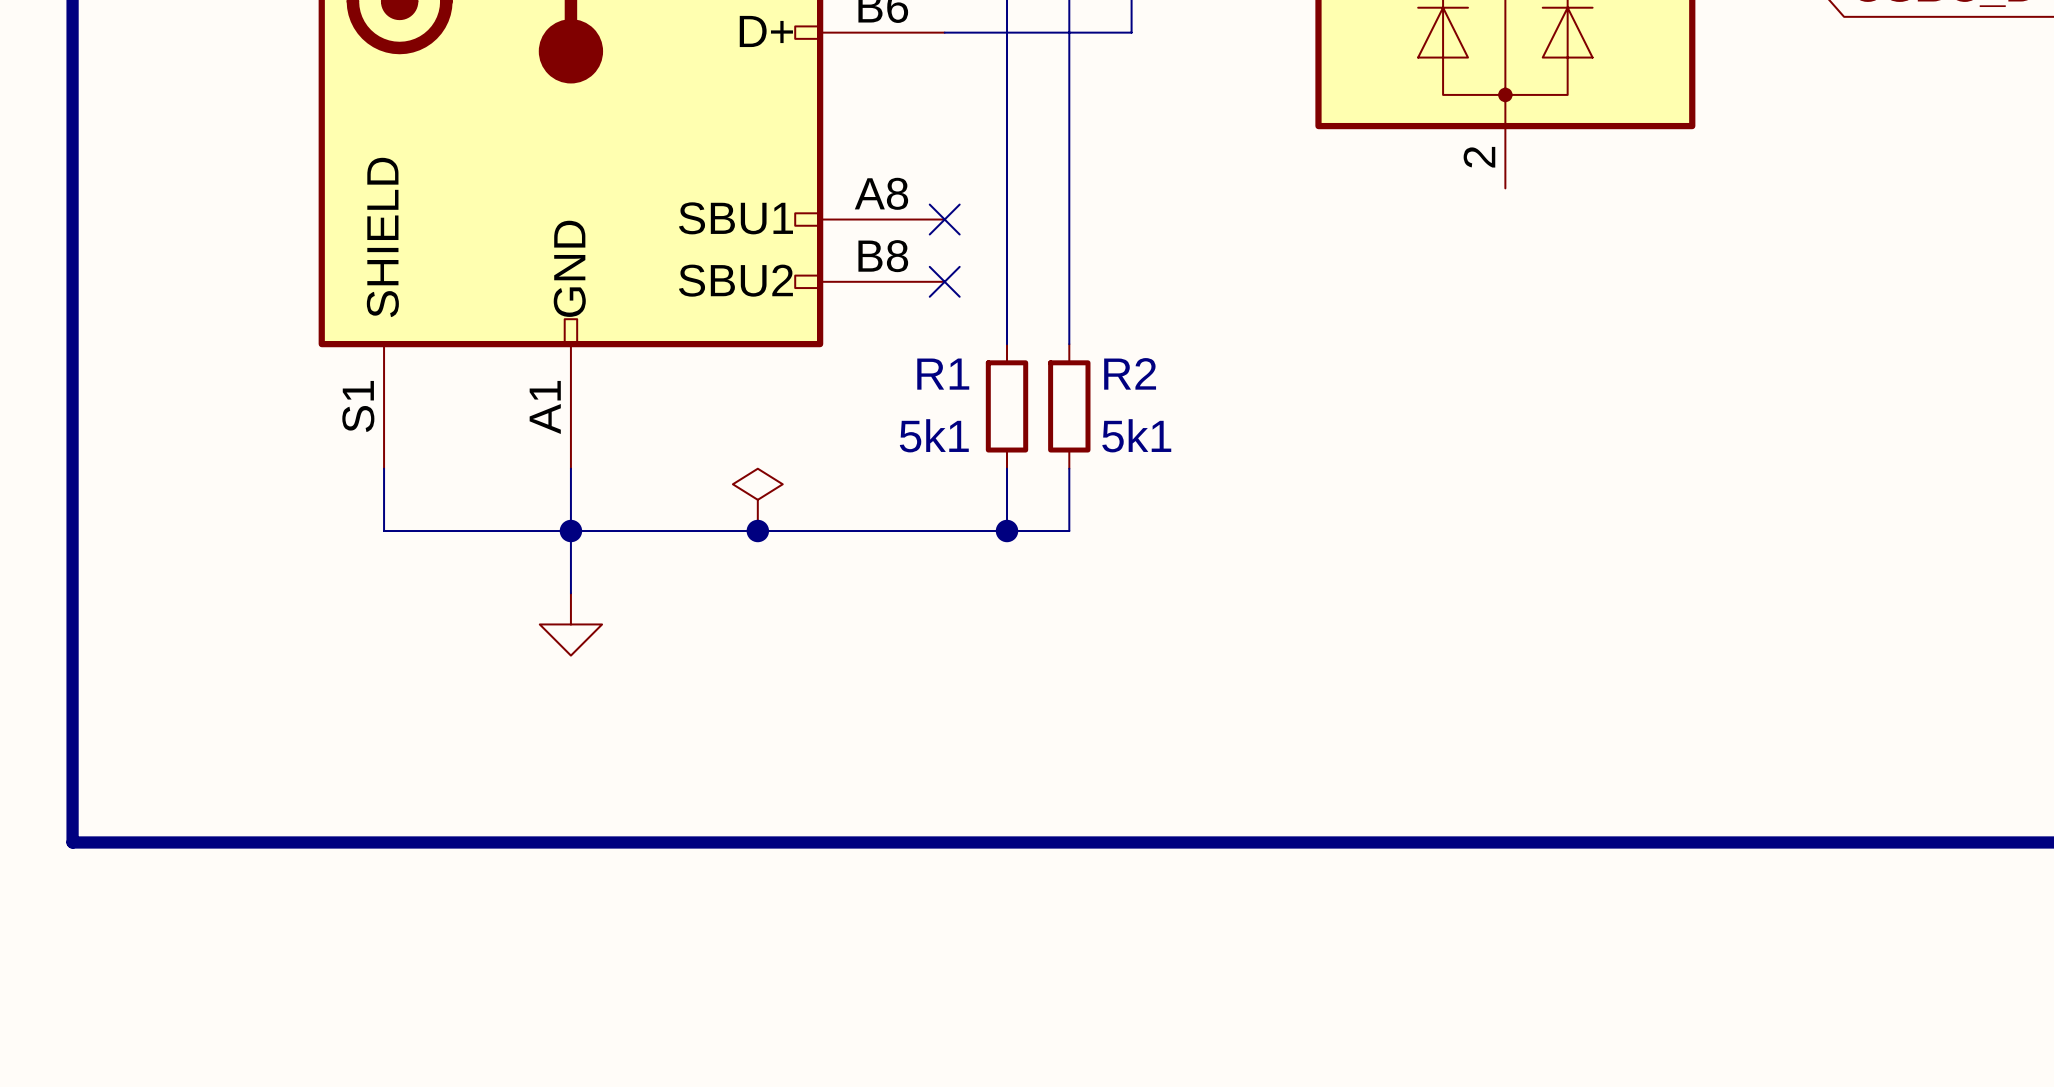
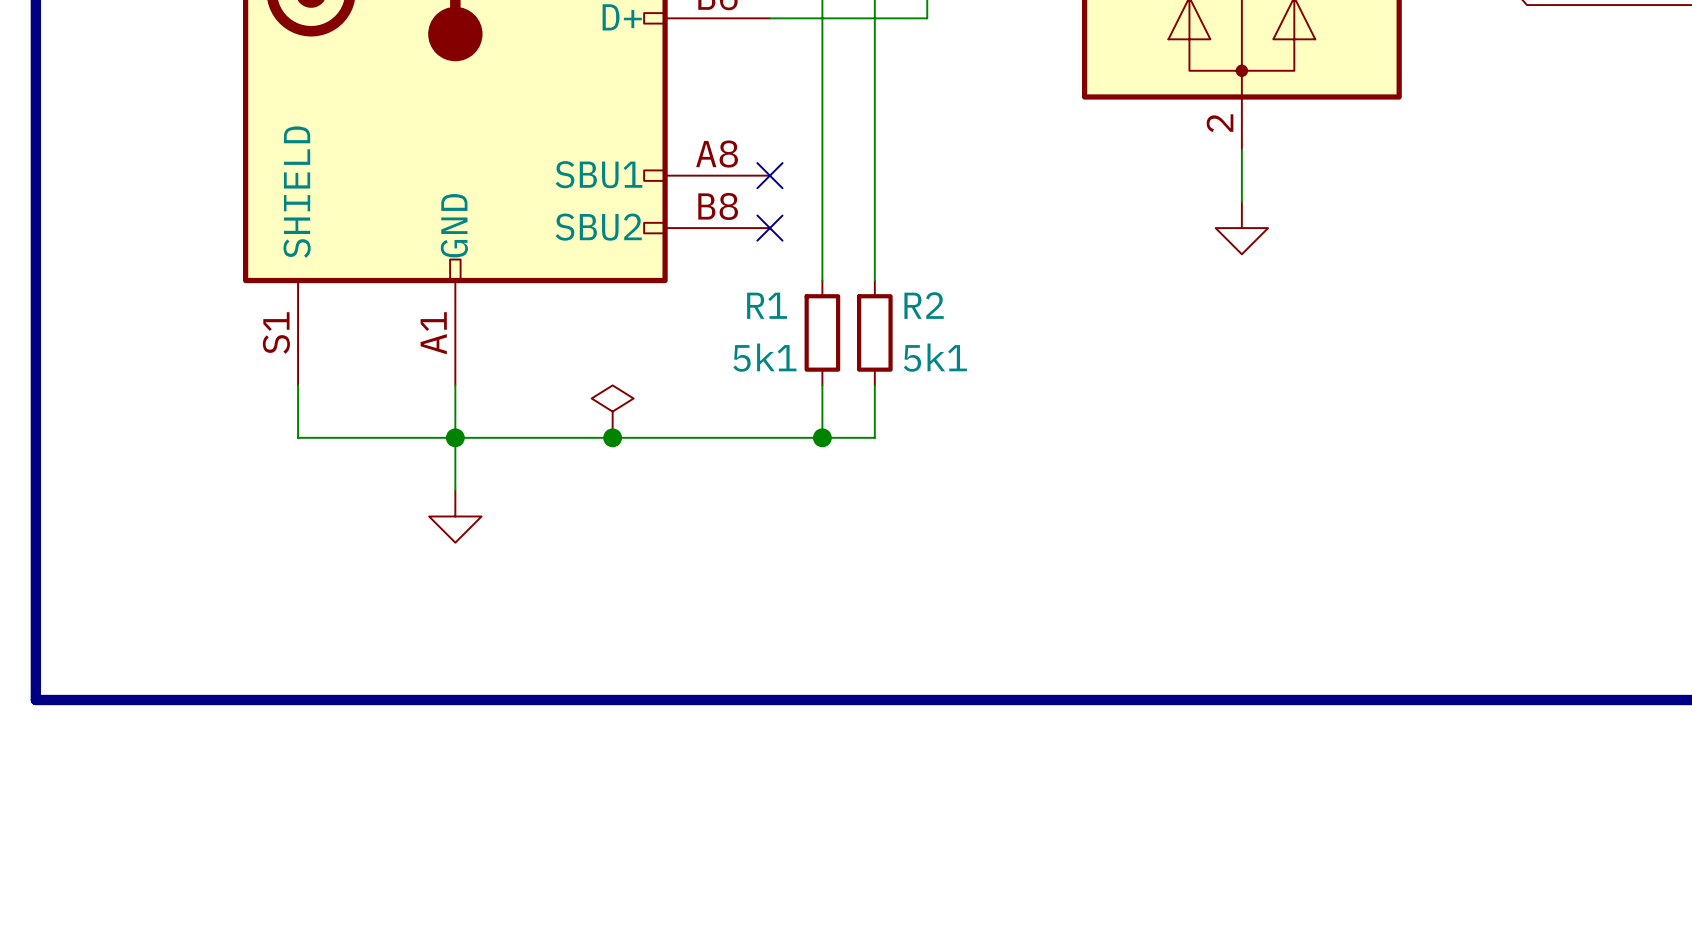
wire: none -> (1241, 149) (1241, 201)
power symbol: none -> (1241, 228)

